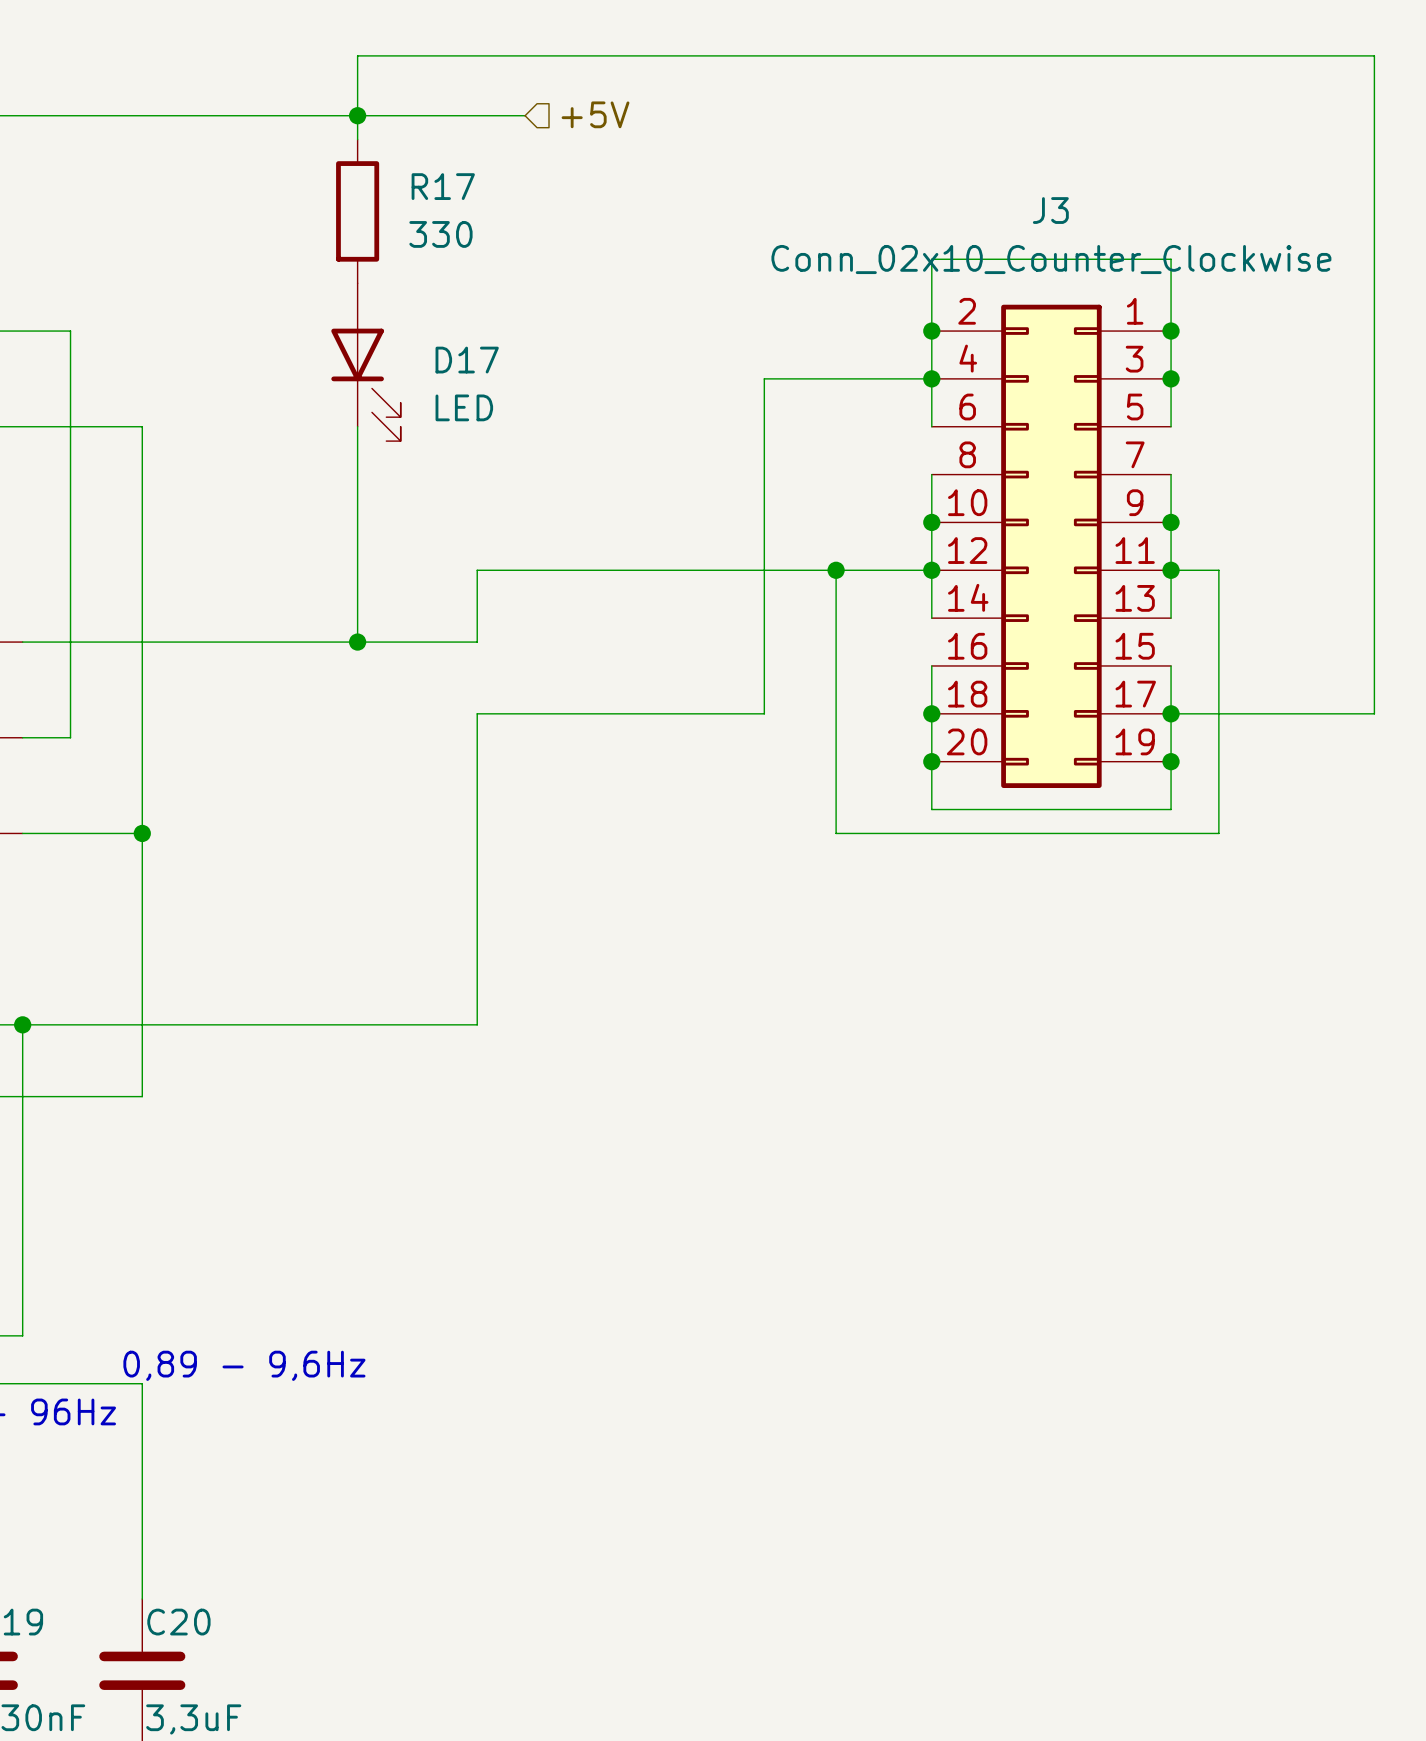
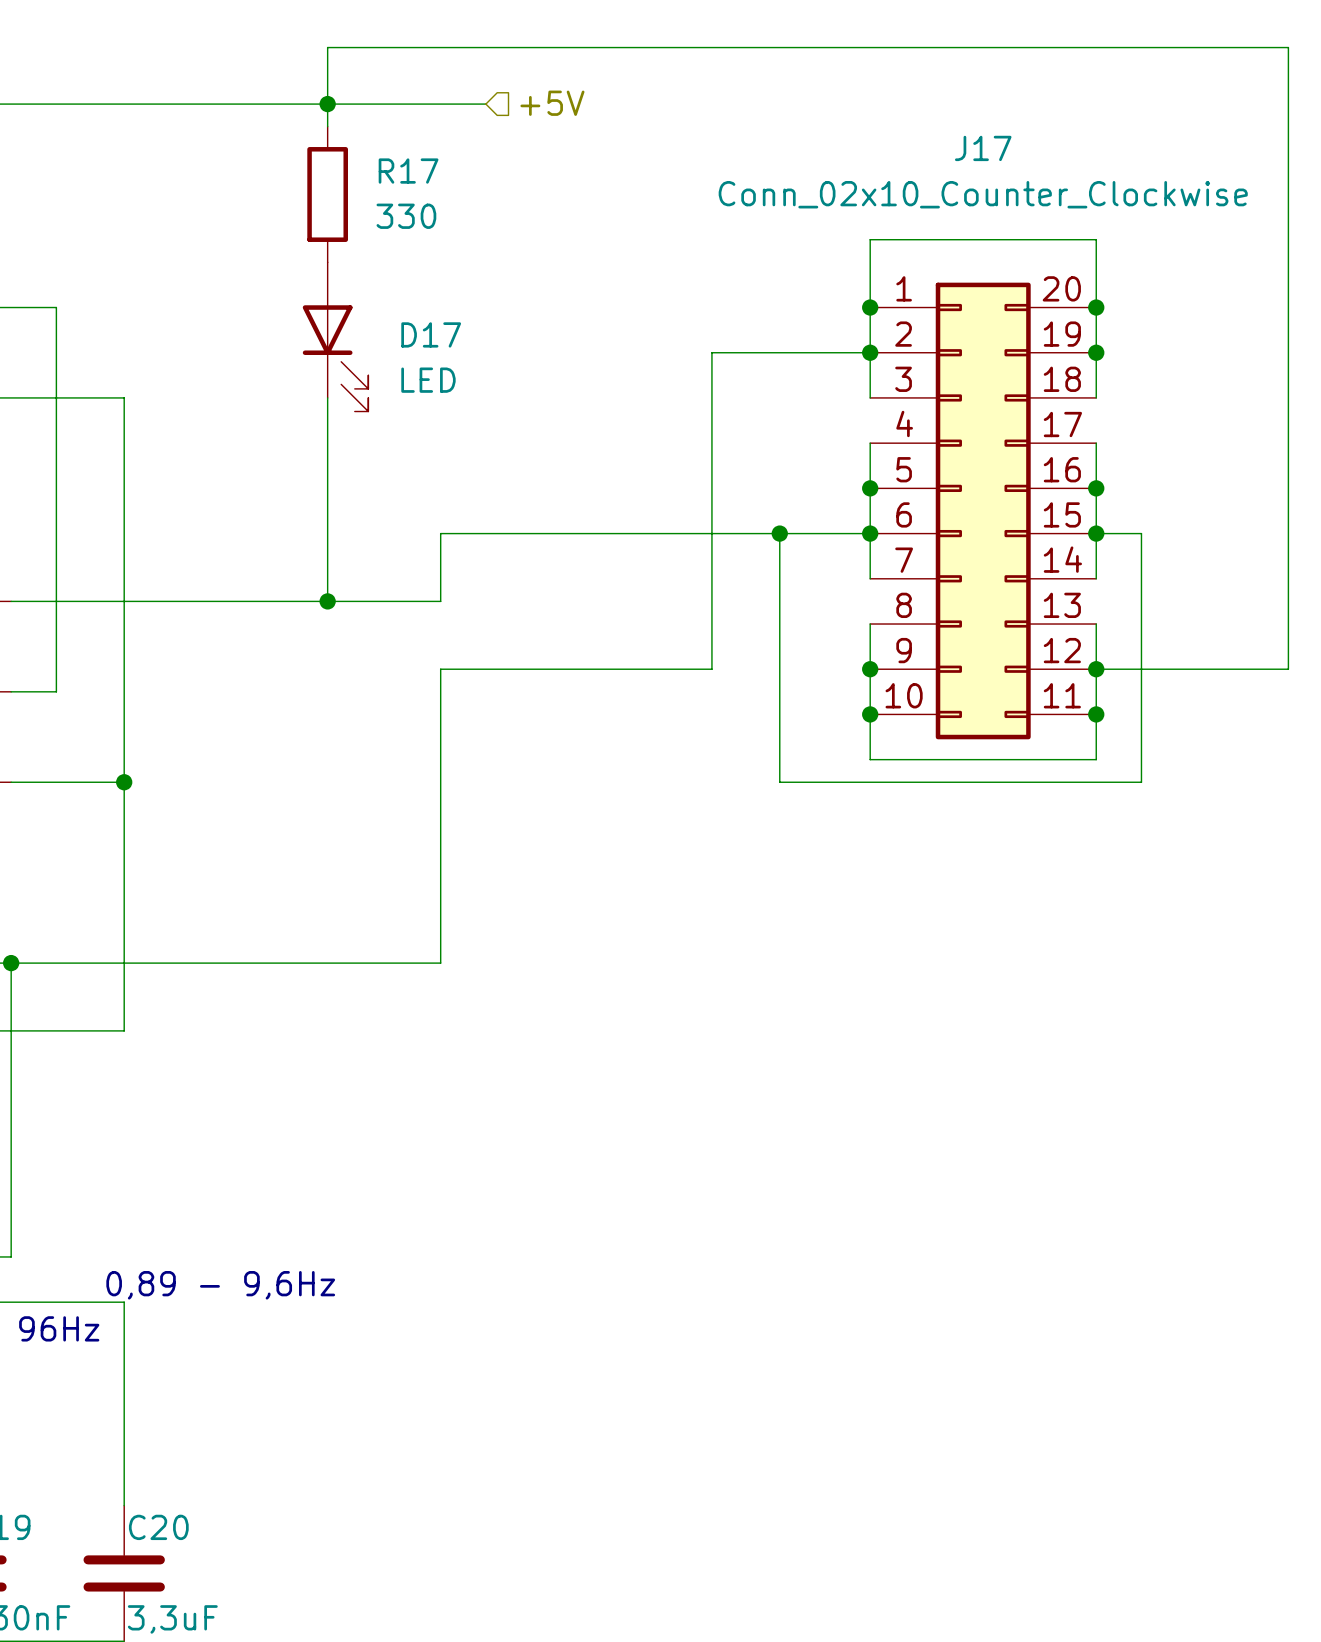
J3 name: J3 (1050, 210) -> J17 (983, 148)
J3 value position: Conn_02x10_Counter_Clockwise (1051, 259) -> Conn_02x10_Counter_Clockwise (983, 194)
J3 symbol: [931, 304, 1172, 788] -> [870, 282, 1097, 740]

